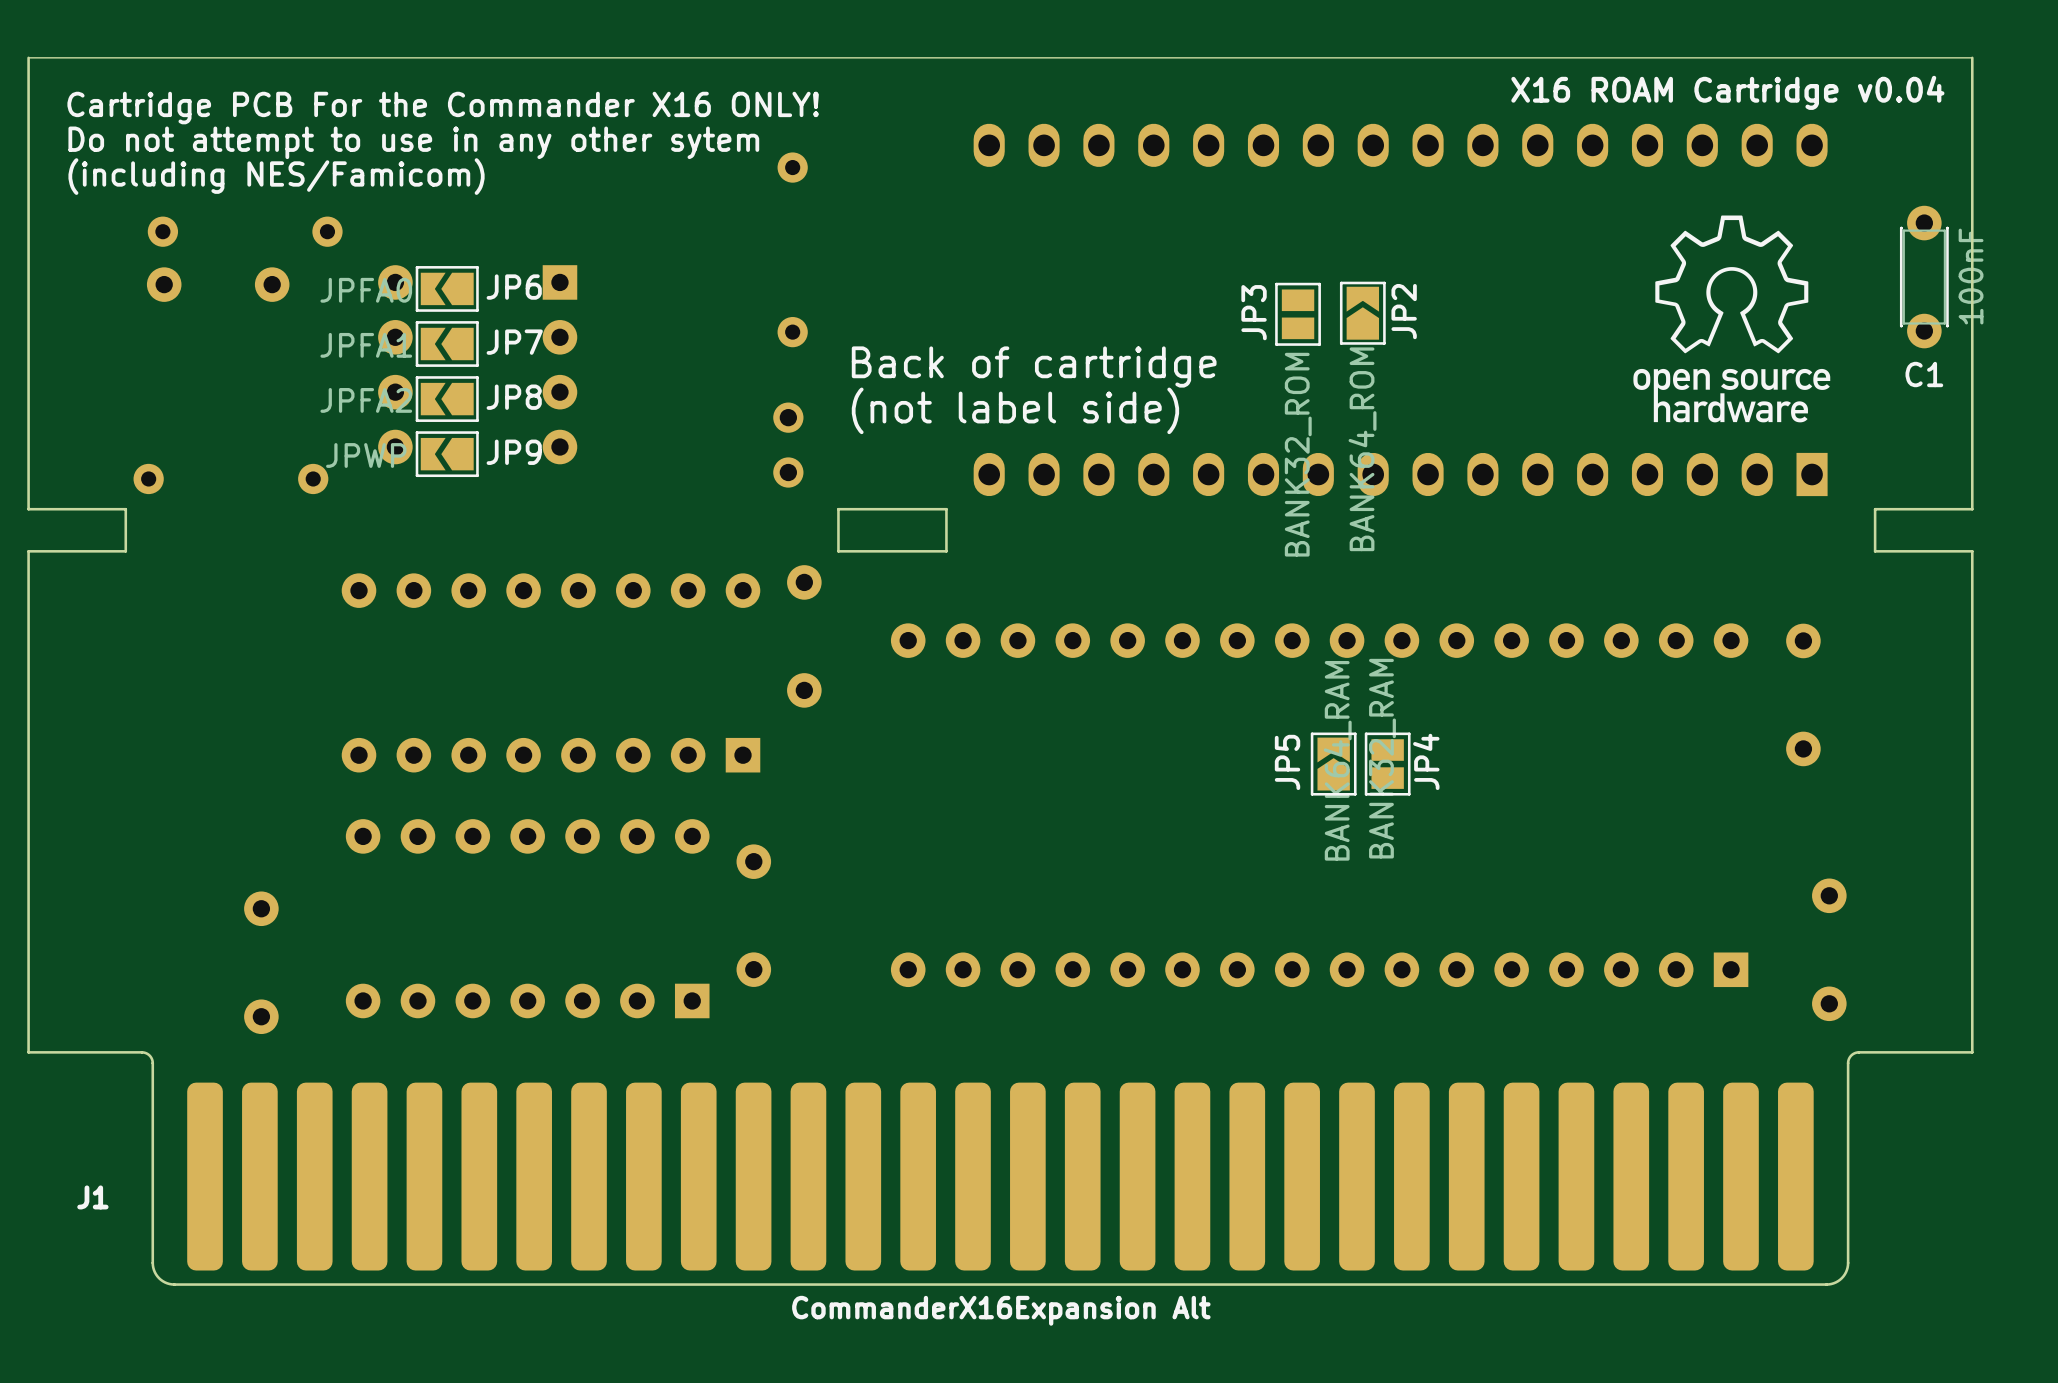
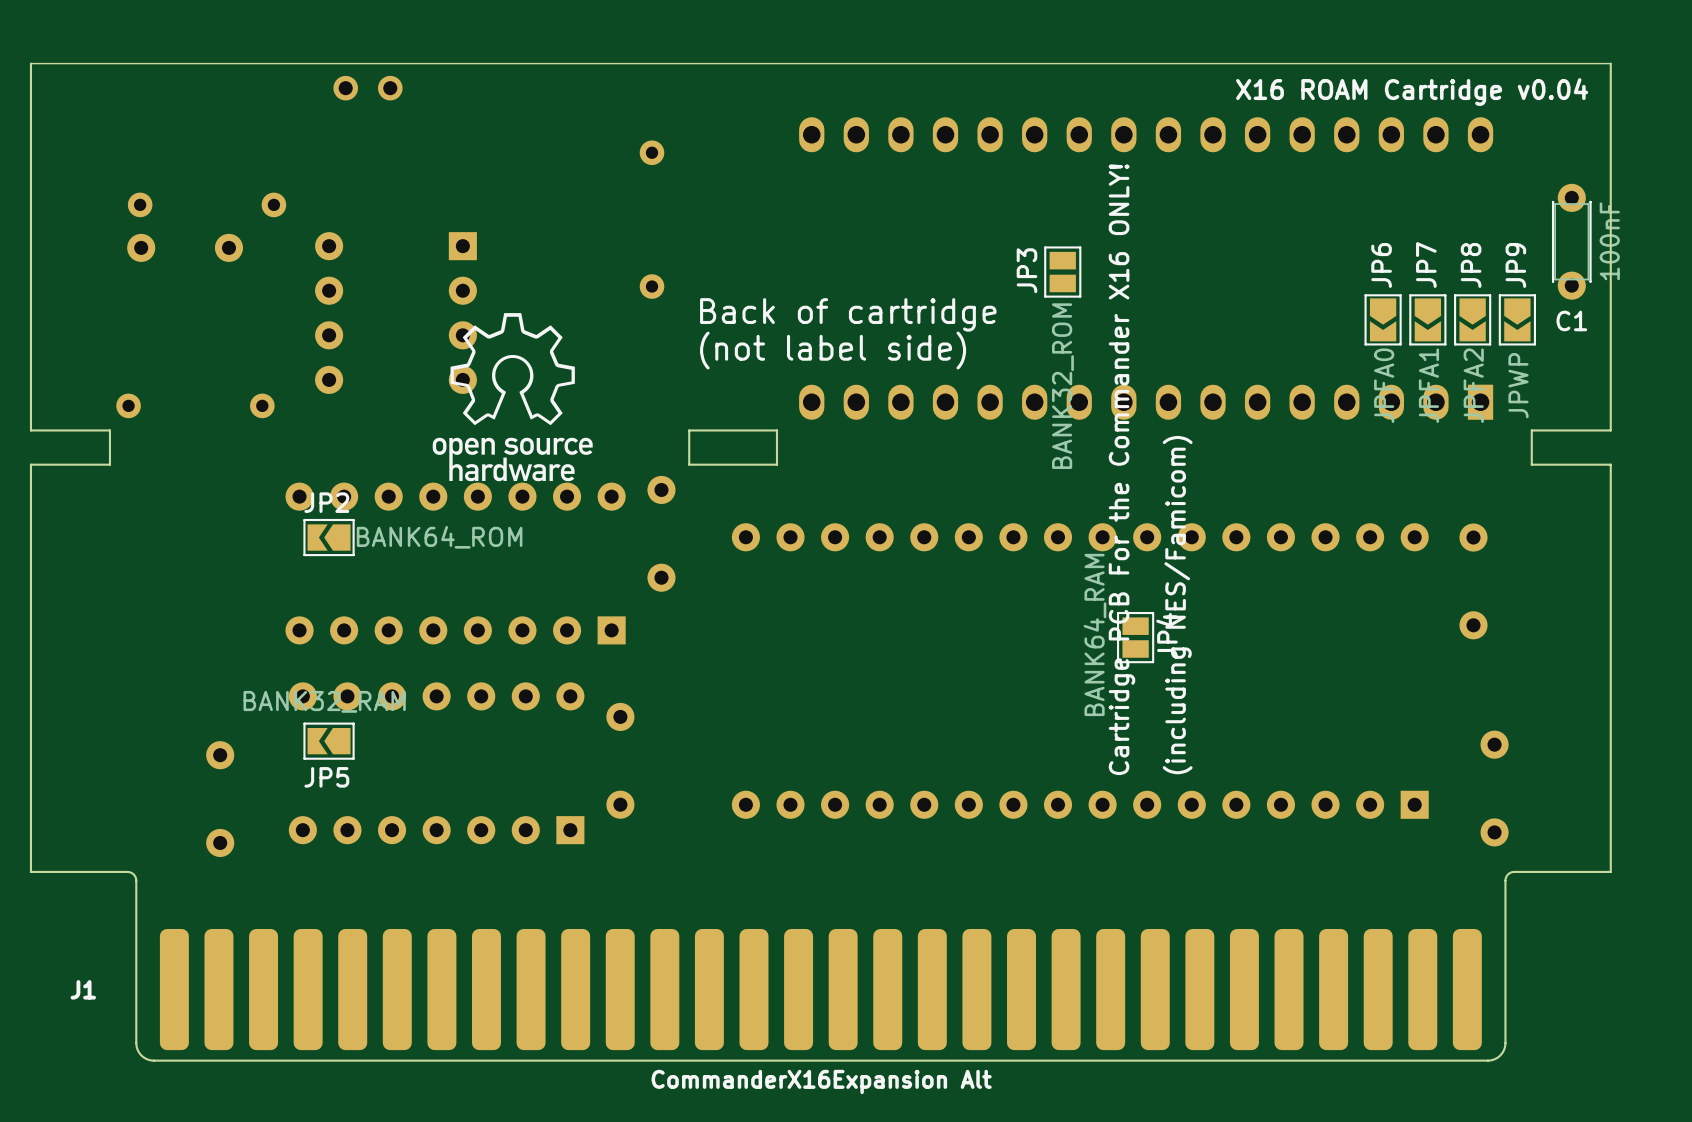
J1 footprint: [27, 56, 1974, 1286] -> [29, 62, 1612, 1062]
text: Cartridge PCB For the Commander X16 ONLY! (443, 108) -> none
text: Do not attempt to use in any other sytem (413, 142) -> none
text: (including NES/Famicom) (276, 176) -> none
drawing: [1633, 215, 1831, 423] -> none
JP6 rotation: 0° (447, 288) -> 90° counterclockwise (1383, 319)
JP6 position: (447, 288) -> (1383, 319)
JP2 rotation: 0° (1362, 313) -> 90° counterclockwise (329, 537)
JP2 position: (1362, 313) -> (329, 537)
JP7 rotation: 0° (447, 344) -> 90° counterclockwise (1427, 319)
JP7 position: (447, 344) -> (1427, 319)
drawing: none -> [432, 313, 593, 482]
JP8 rotation: 0° (447, 399) -> 90° counterclockwise (1472, 319)
JP8 position: (447, 399) -> (1472, 319)
part rotation: 0° (788, 445) -> 90° clockwise (367, 88)
part position: (788, 445) -> (367, 88)
JP9 rotation: 0° (447, 454) -> 90° counterclockwise (1517, 319)
JP9 position: (447, 454) -> (1517, 319)
text: none -> Cartridge PCB For the Commander X16 ONLY! (1121, 469)
text: none -> (including NES/Famicom) (1177, 605)
JP5 rotation: 0° (1333, 764) -> 90° counterclockwise (329, 741)
JP5 position: (1333, 764) -> (329, 741)

